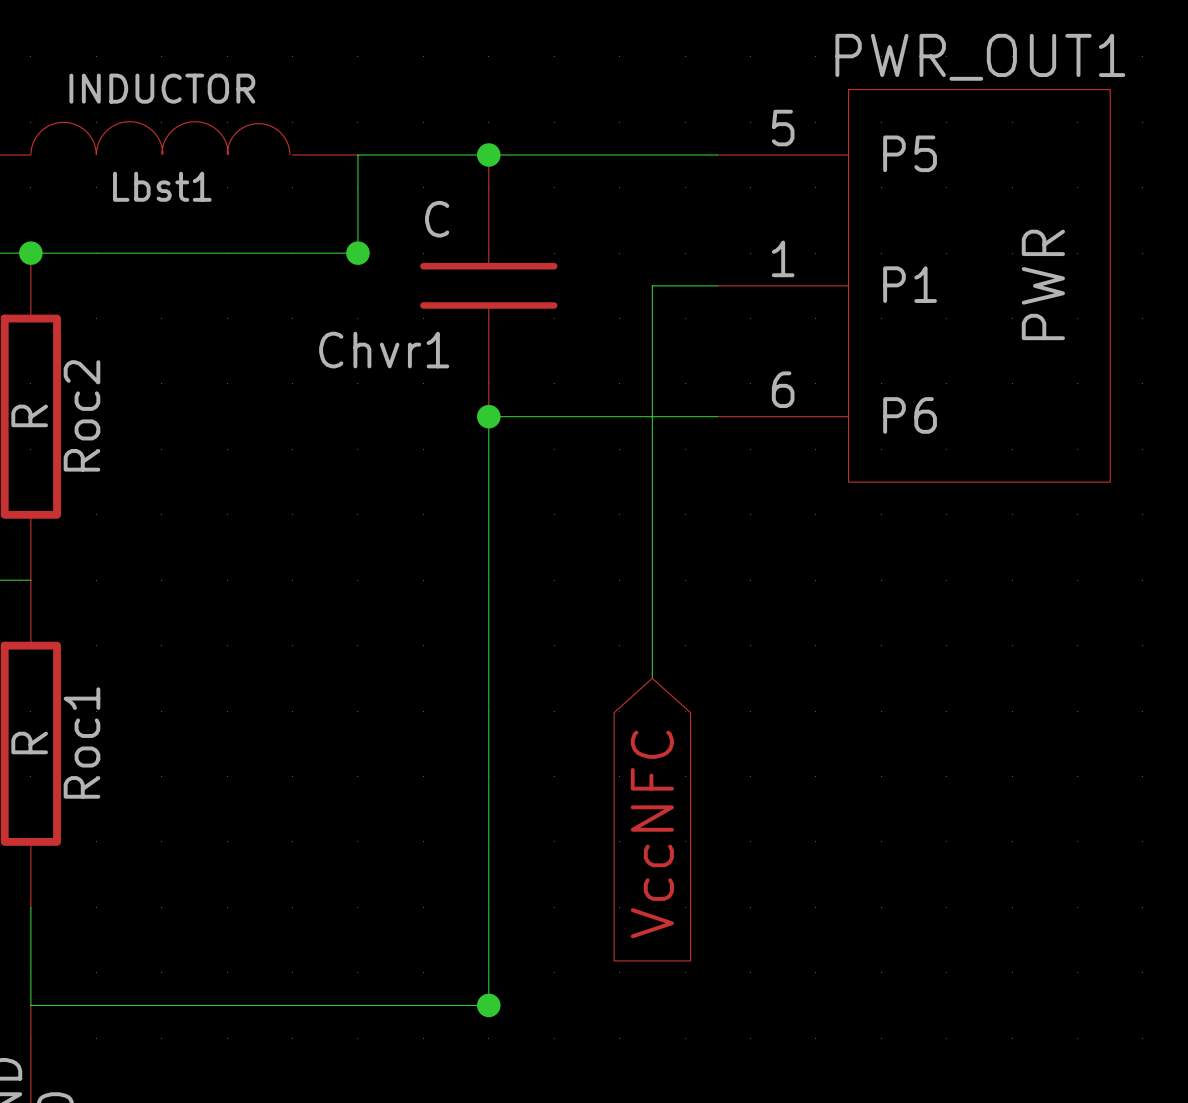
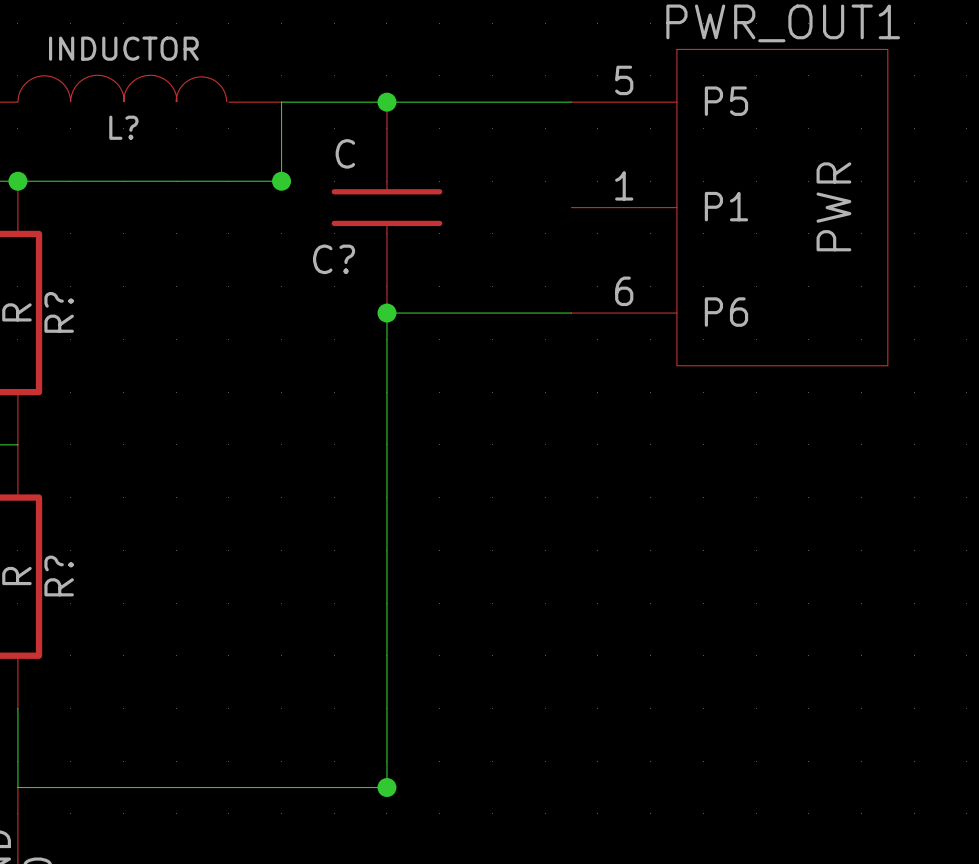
Lbst1 name: Lbst1 (162, 186) -> L? (123, 127)
wire: (717, 285) (652, 285) (652, 678) -> none
Chvr1 name: Chvr1 (384, 350) -> C? (334, 259)
Roc2 name: Roc2 (81, 415) -> R? (59, 312)
Roc1 name: Roc1 (81, 742) -> R? (59, 576)
global label: VccNFC (652, 834) -> none

